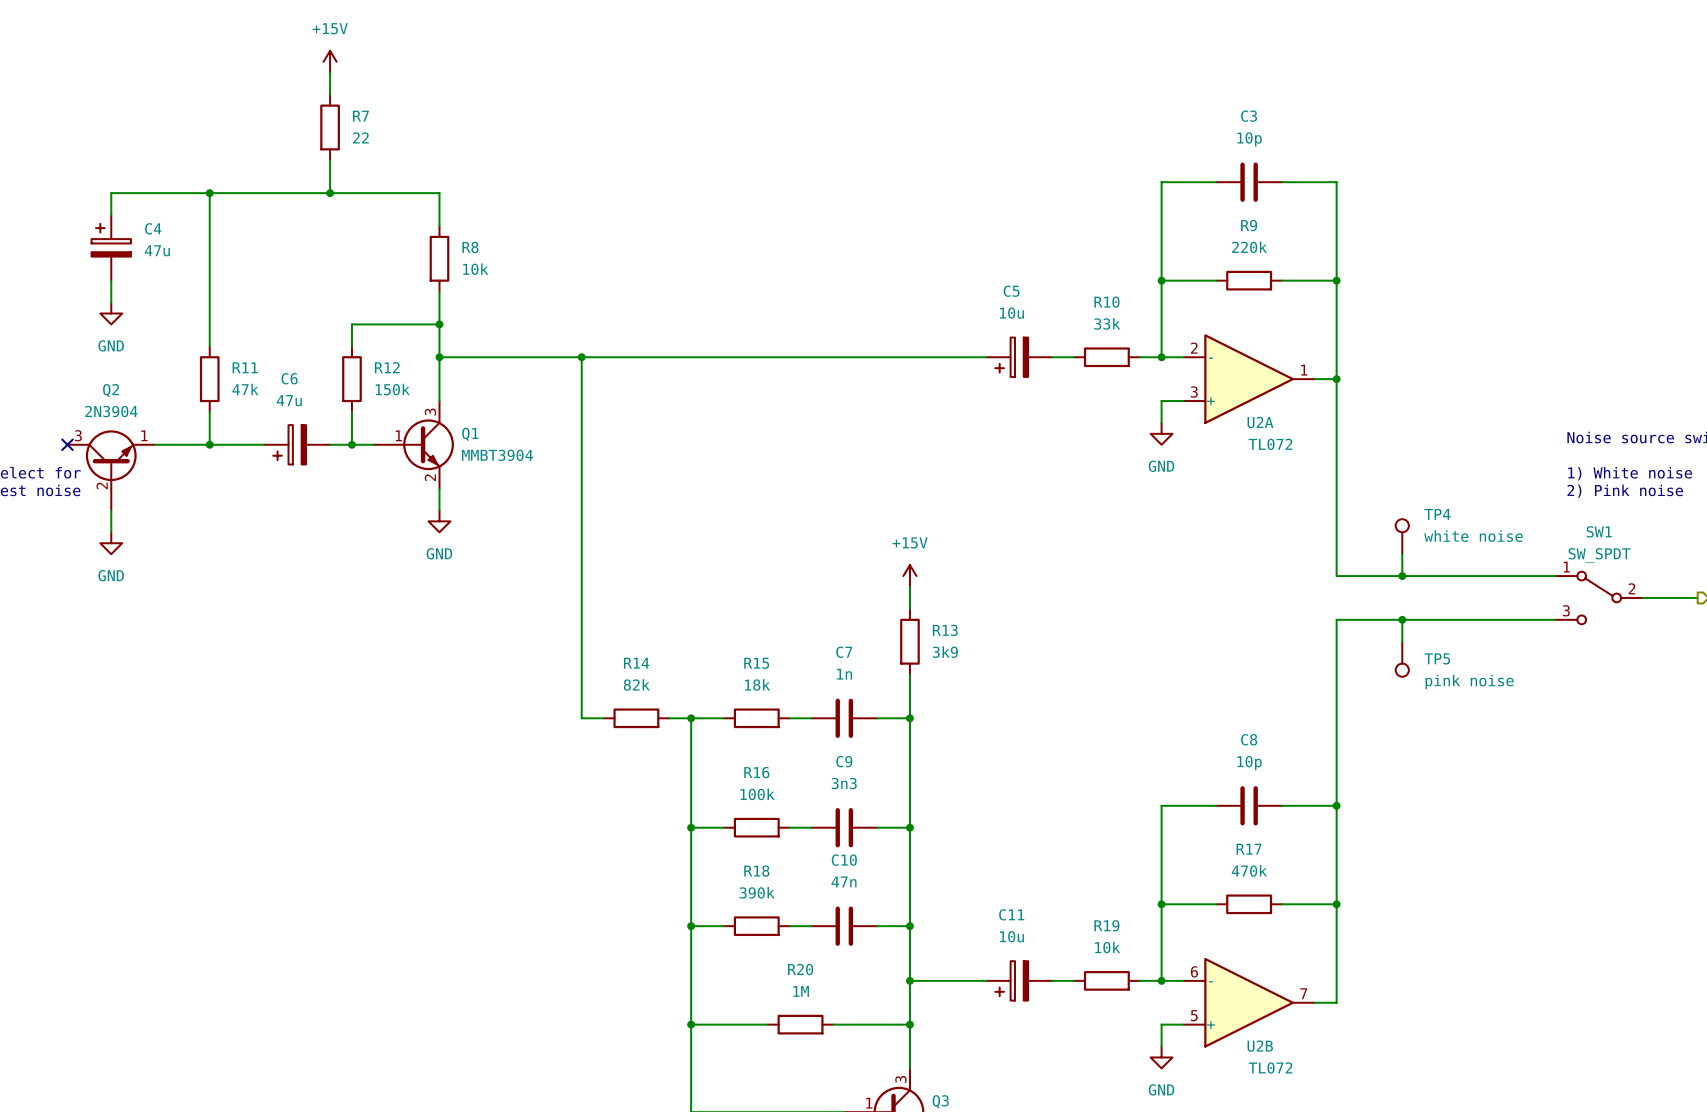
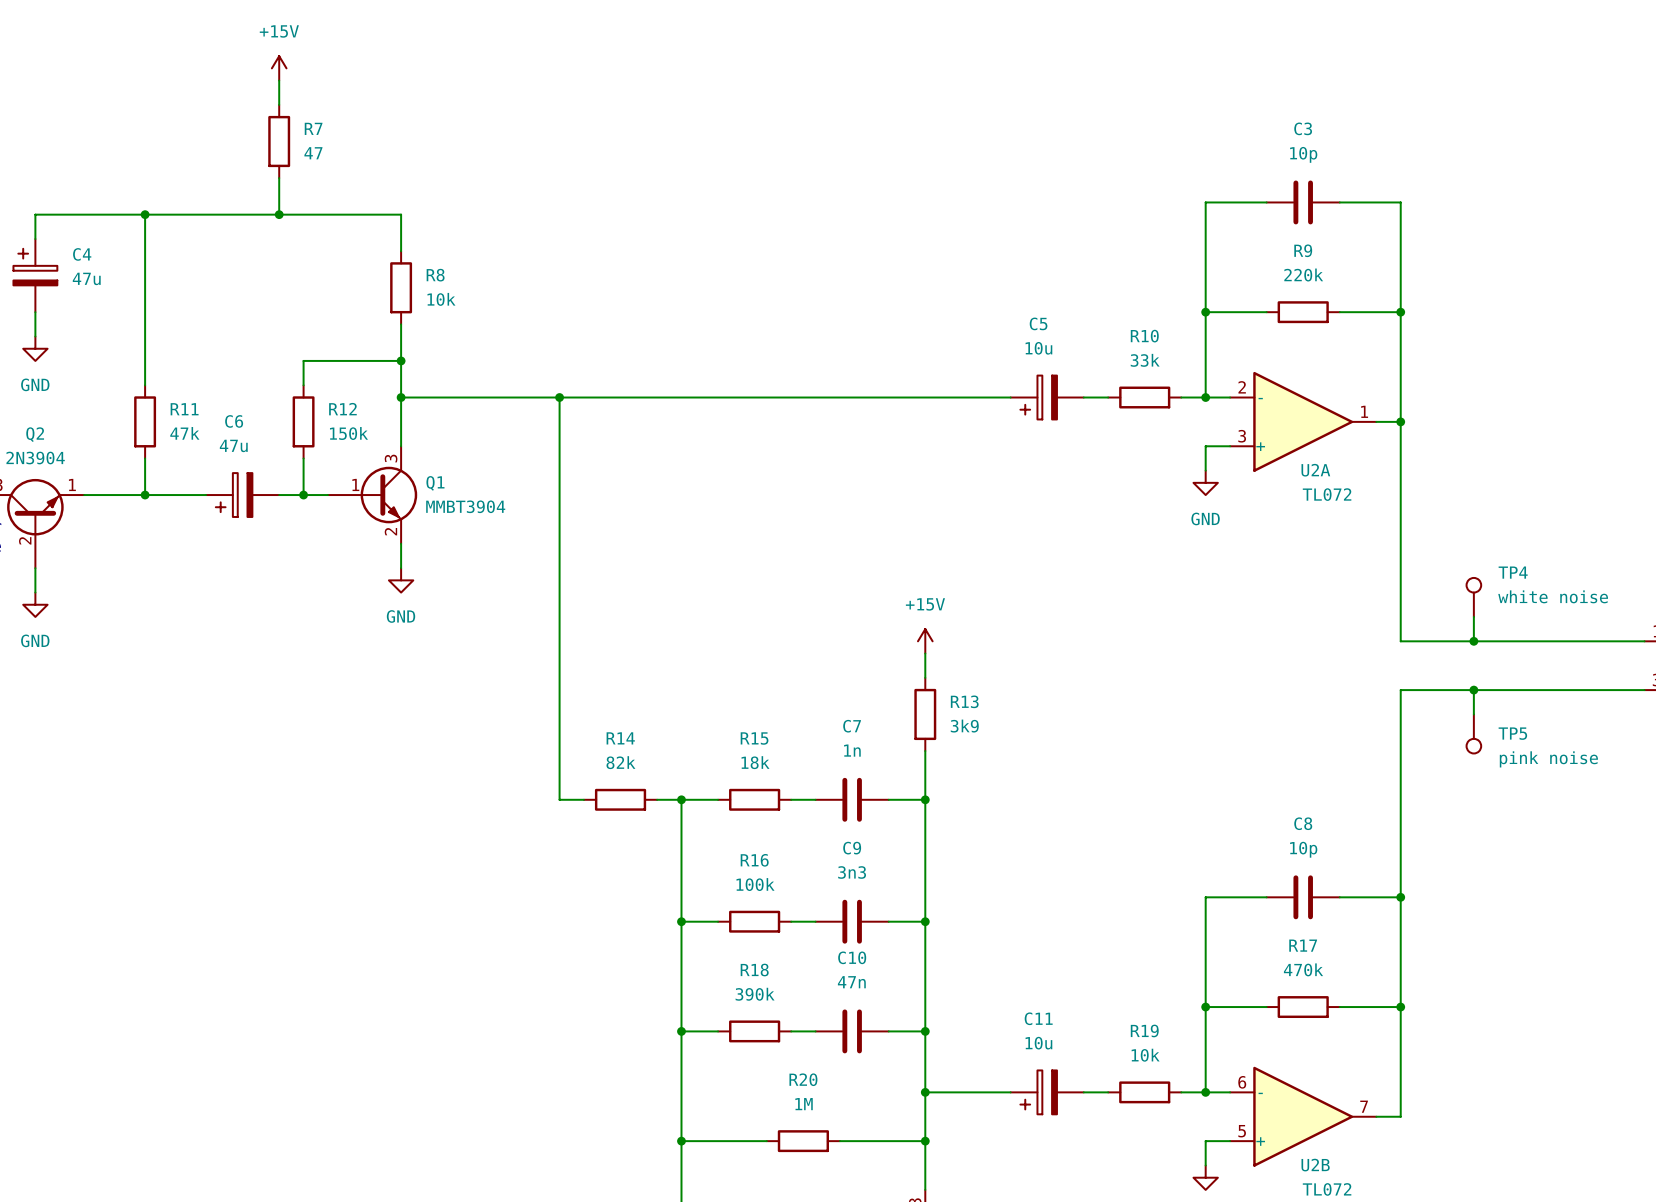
R7 value: 22 (360, 137) -> 47 (313, 153)

